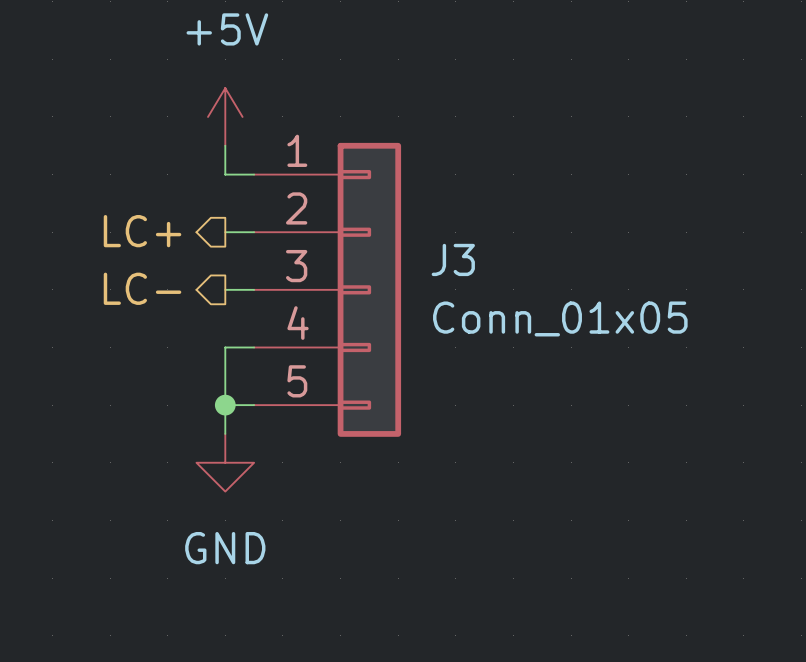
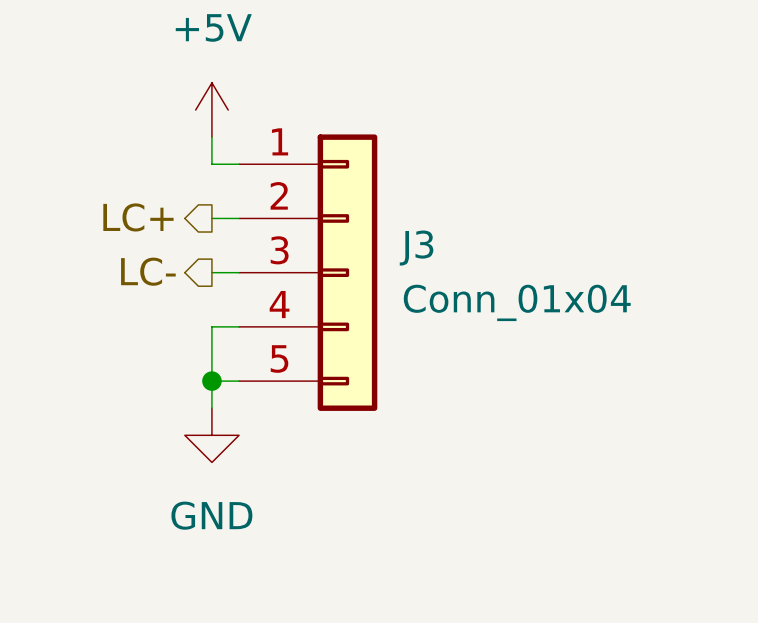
J3 value: Conn_01x05 (560, 318) -> Conn_01x04 (517, 302)

